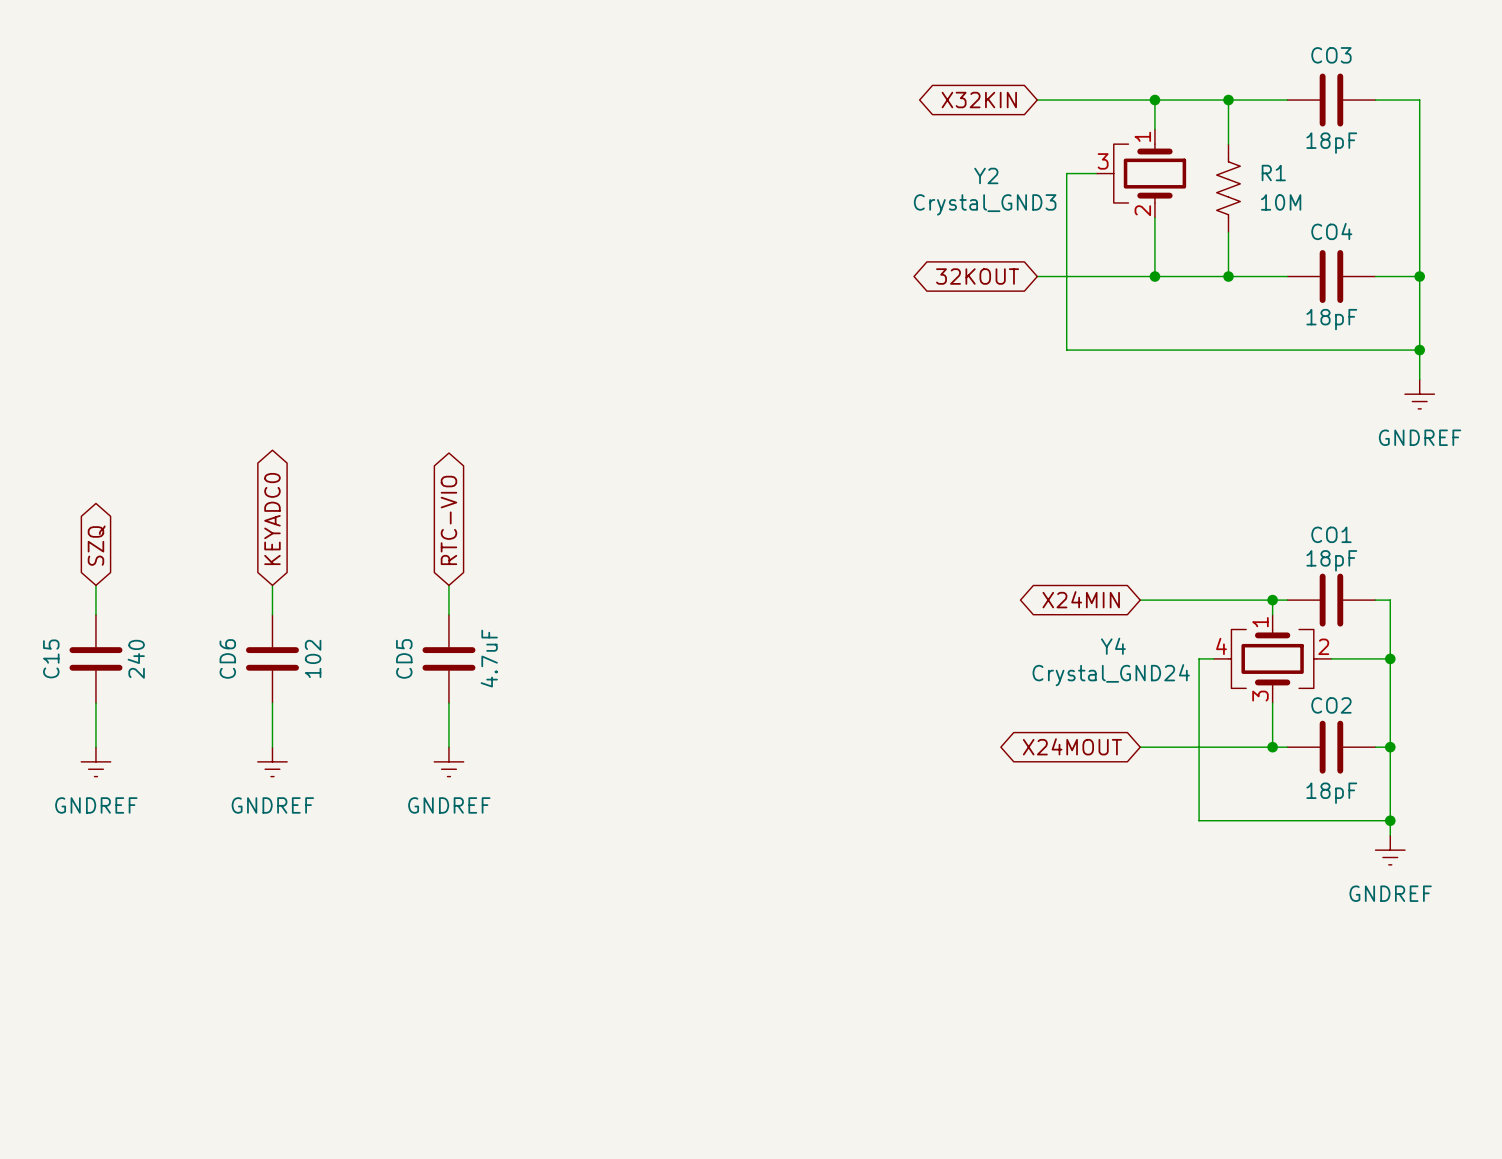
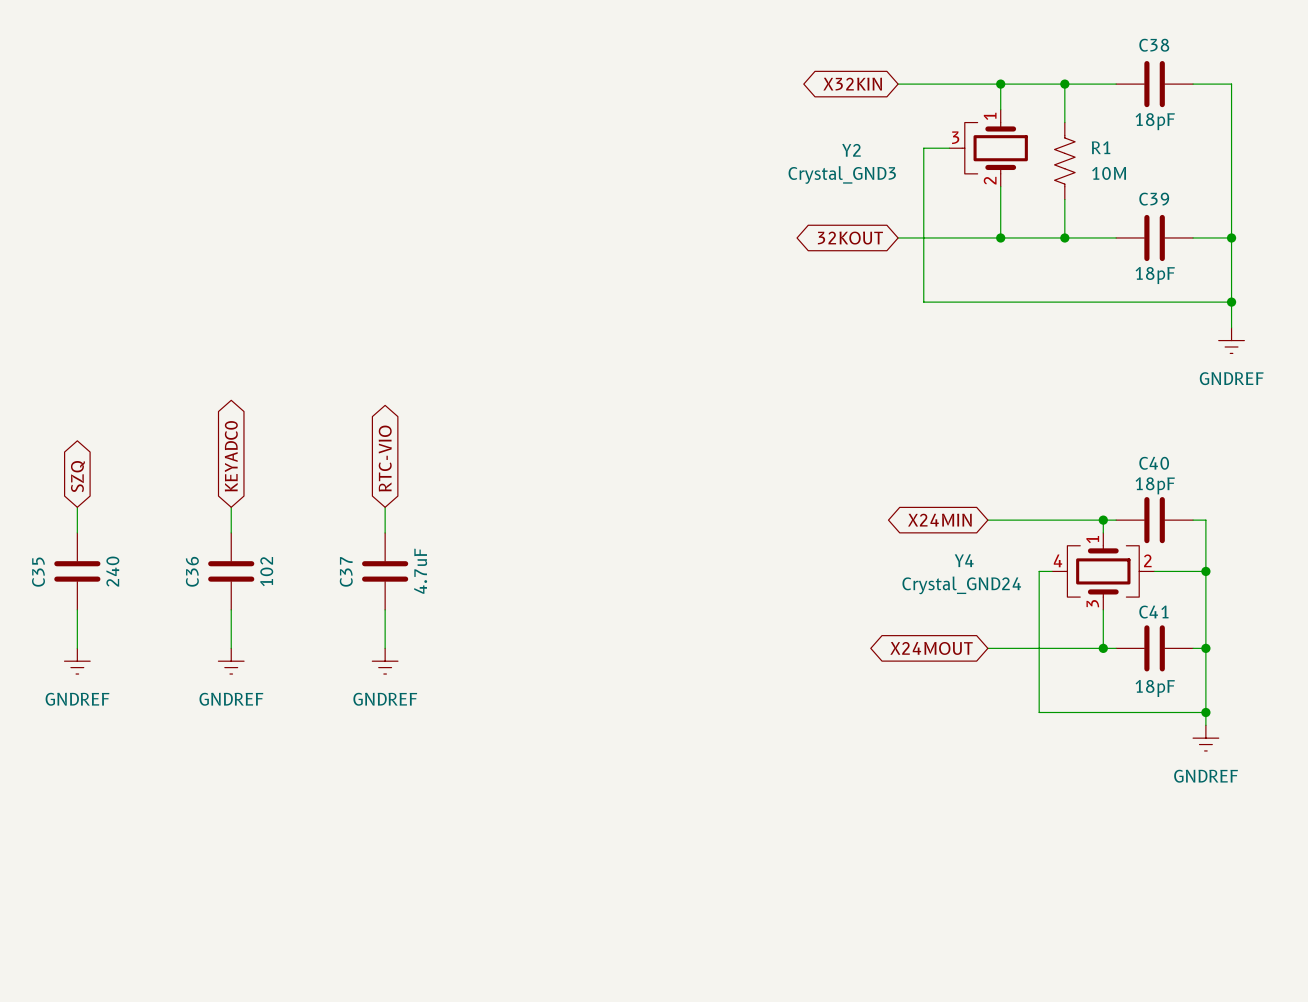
CO3 name: CO3 (1331, 55) -> C38 (1154, 45)
CO4 name: CO4 (1331, 231) -> C39 (1154, 199)
CO1 name: CO1 (1331, 534) -> C40 (1154, 463)
C15 name: C15 (51, 658) -> C35 (38, 572)
CD6 name: CD6 (227, 658) -> C36 (192, 571)
CD5 name: CD5 (404, 658) -> C37 (346, 571)
CO2 name: CO2 (1331, 705) -> C41 (1153, 612)

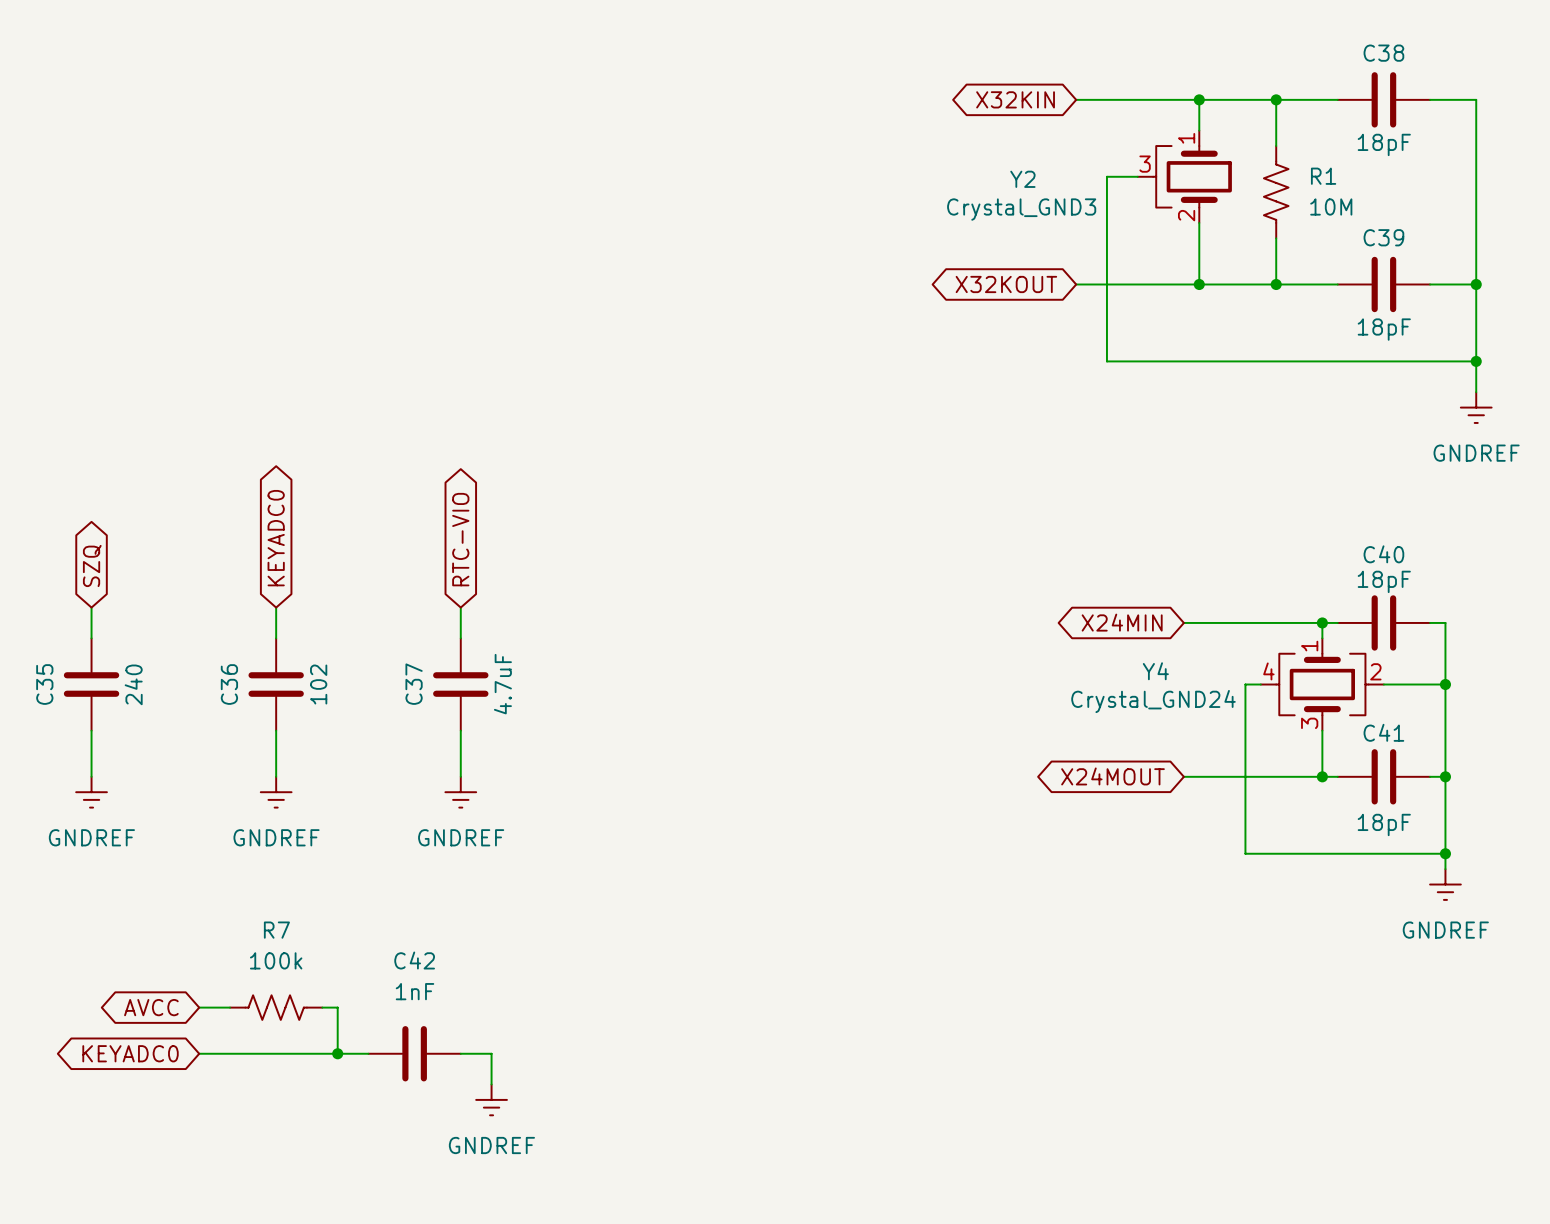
global label: 32KOUT (850, 238) -> X32KOUT (1006, 284)
global label: none -> AVCC (151, 1007)
wire: none -> (199, 1007) (230, 1007)
R7: none -> 100k (276, 1007)
wire: none -> (322, 1007) (337, 1007) (337, 1053)
global label: none -> KEYADC0 (130, 1053)
wire: none -> (199, 1053) (368, 1053)
junction: none -> (337, 1053)
C42: none -> 1nF (414, 1053)
wire: none -> (460, 1053) (491, 1053) (491, 1084)
power symbol: none -> GNDREF (491, 1099)

